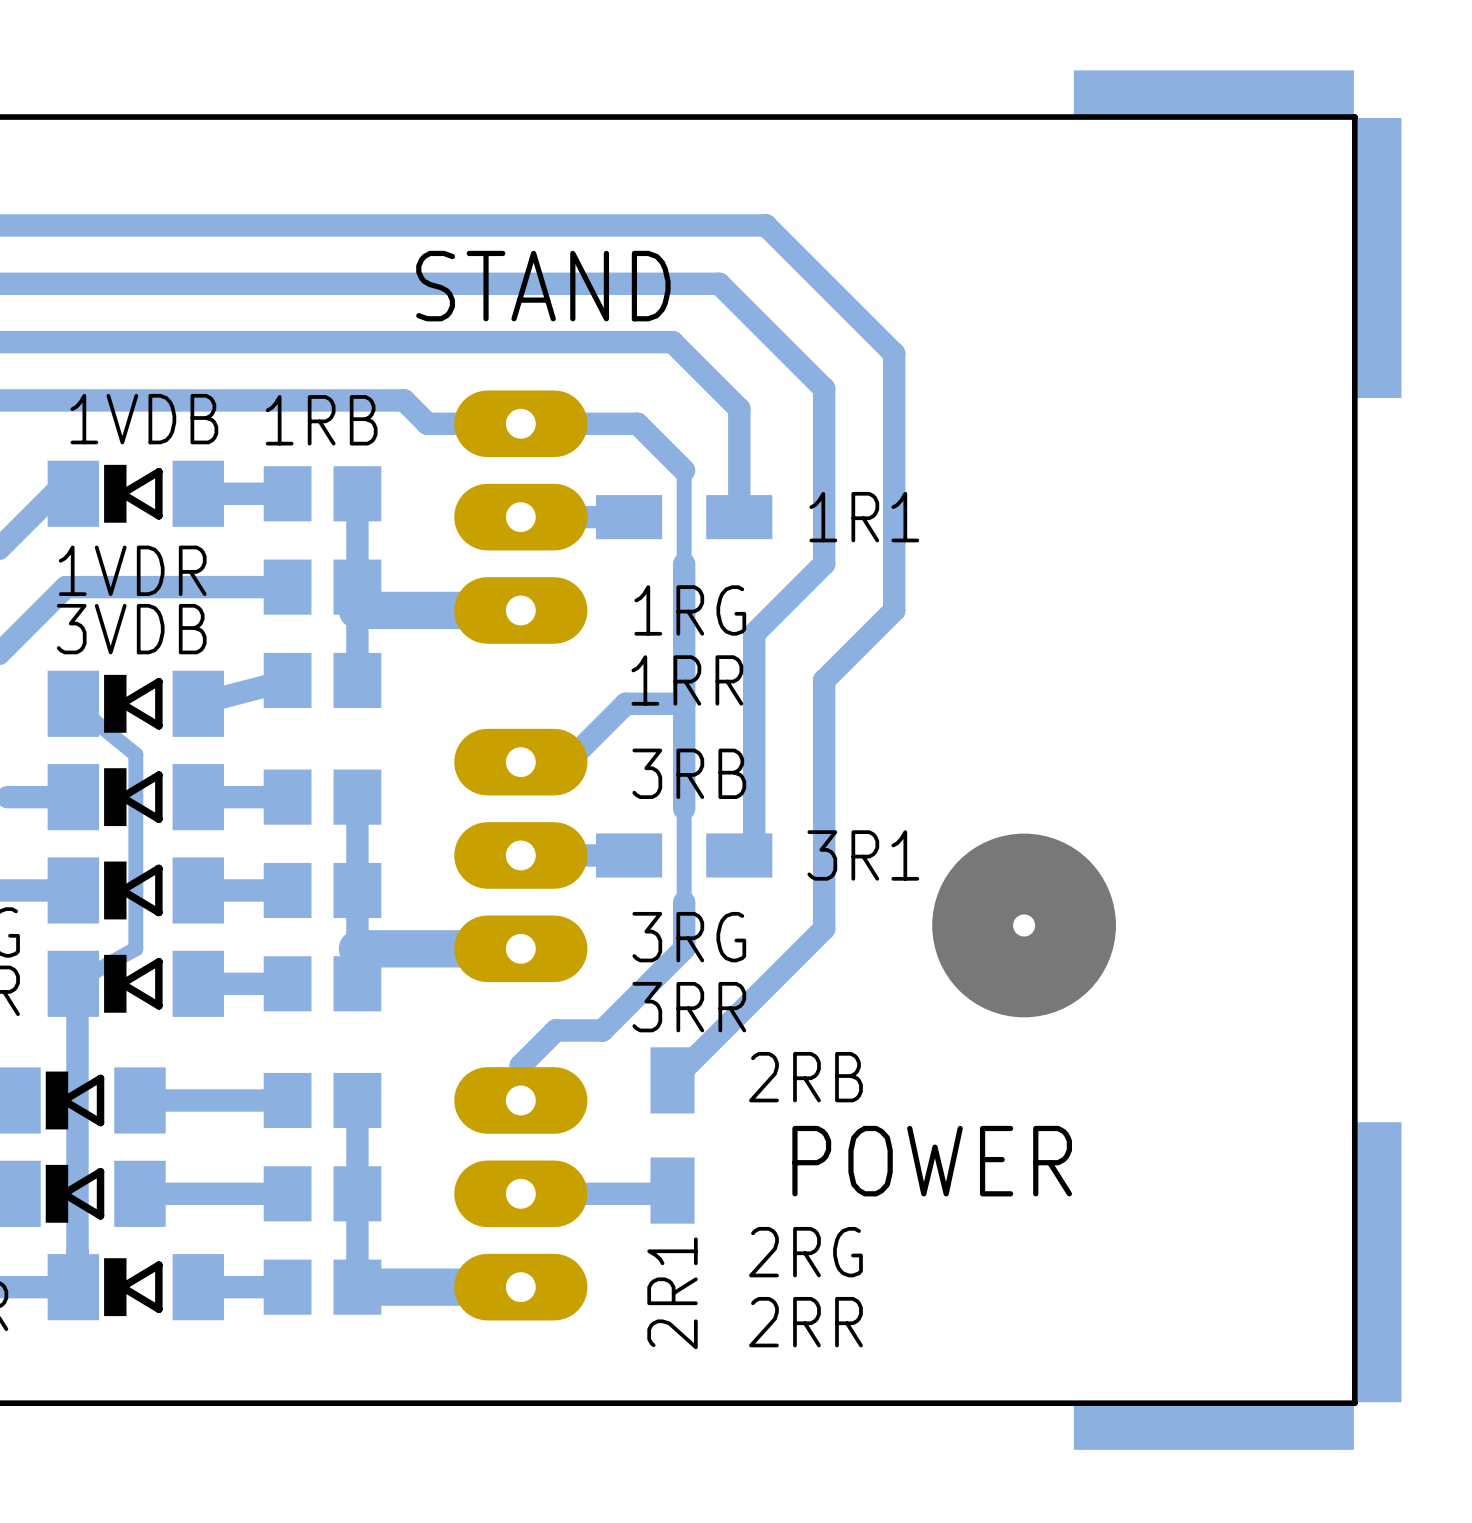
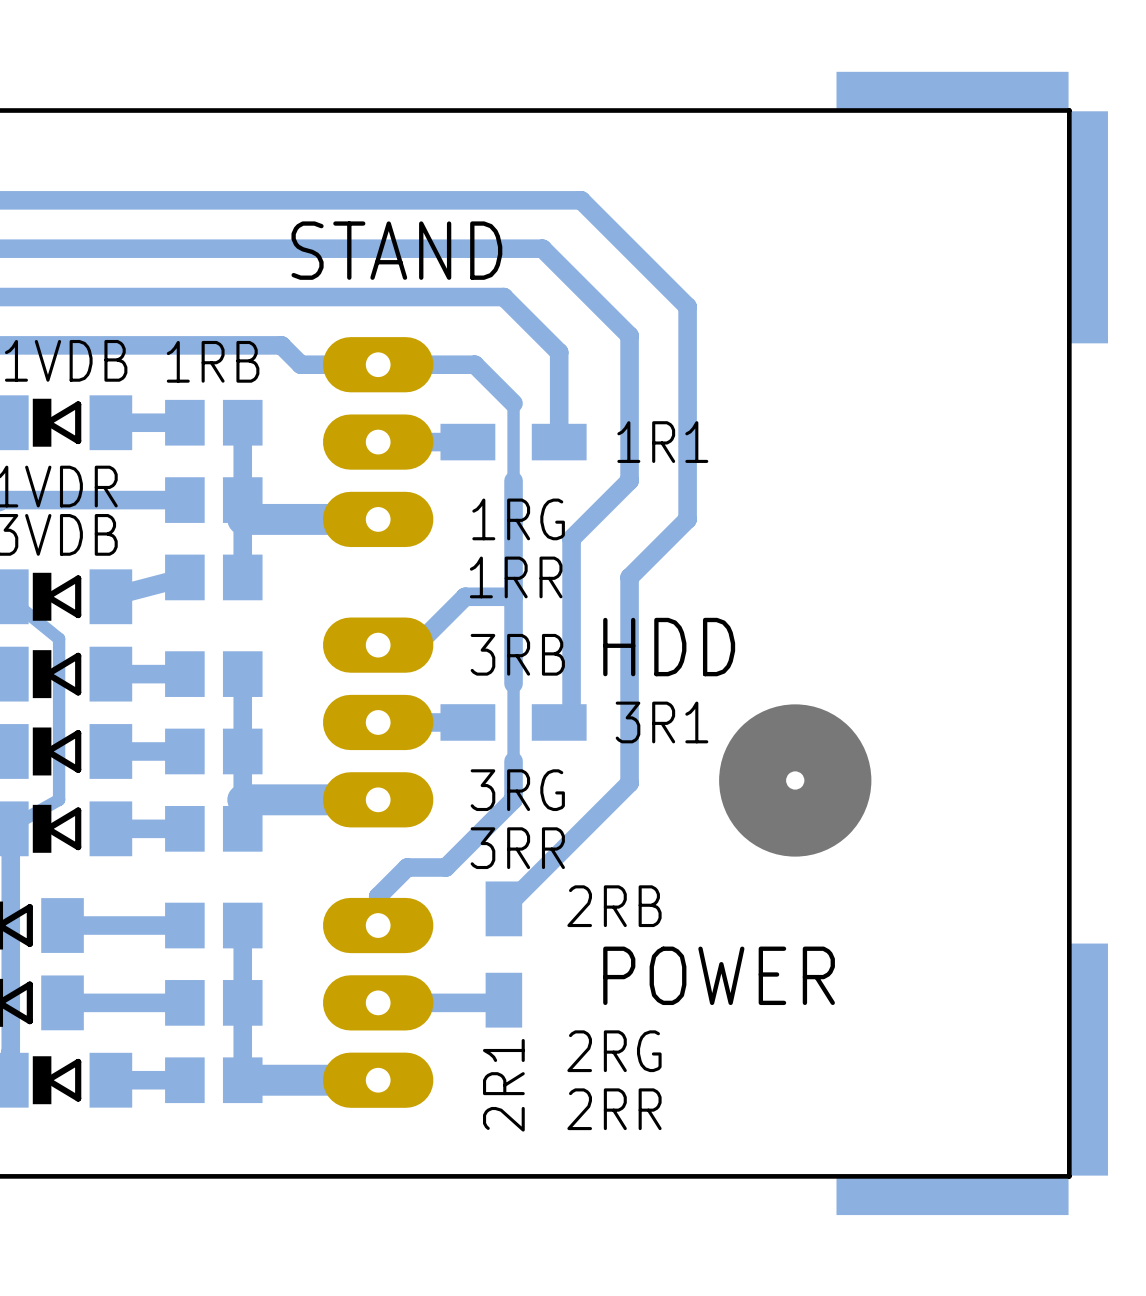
text: none -> HDD (669, 647)

